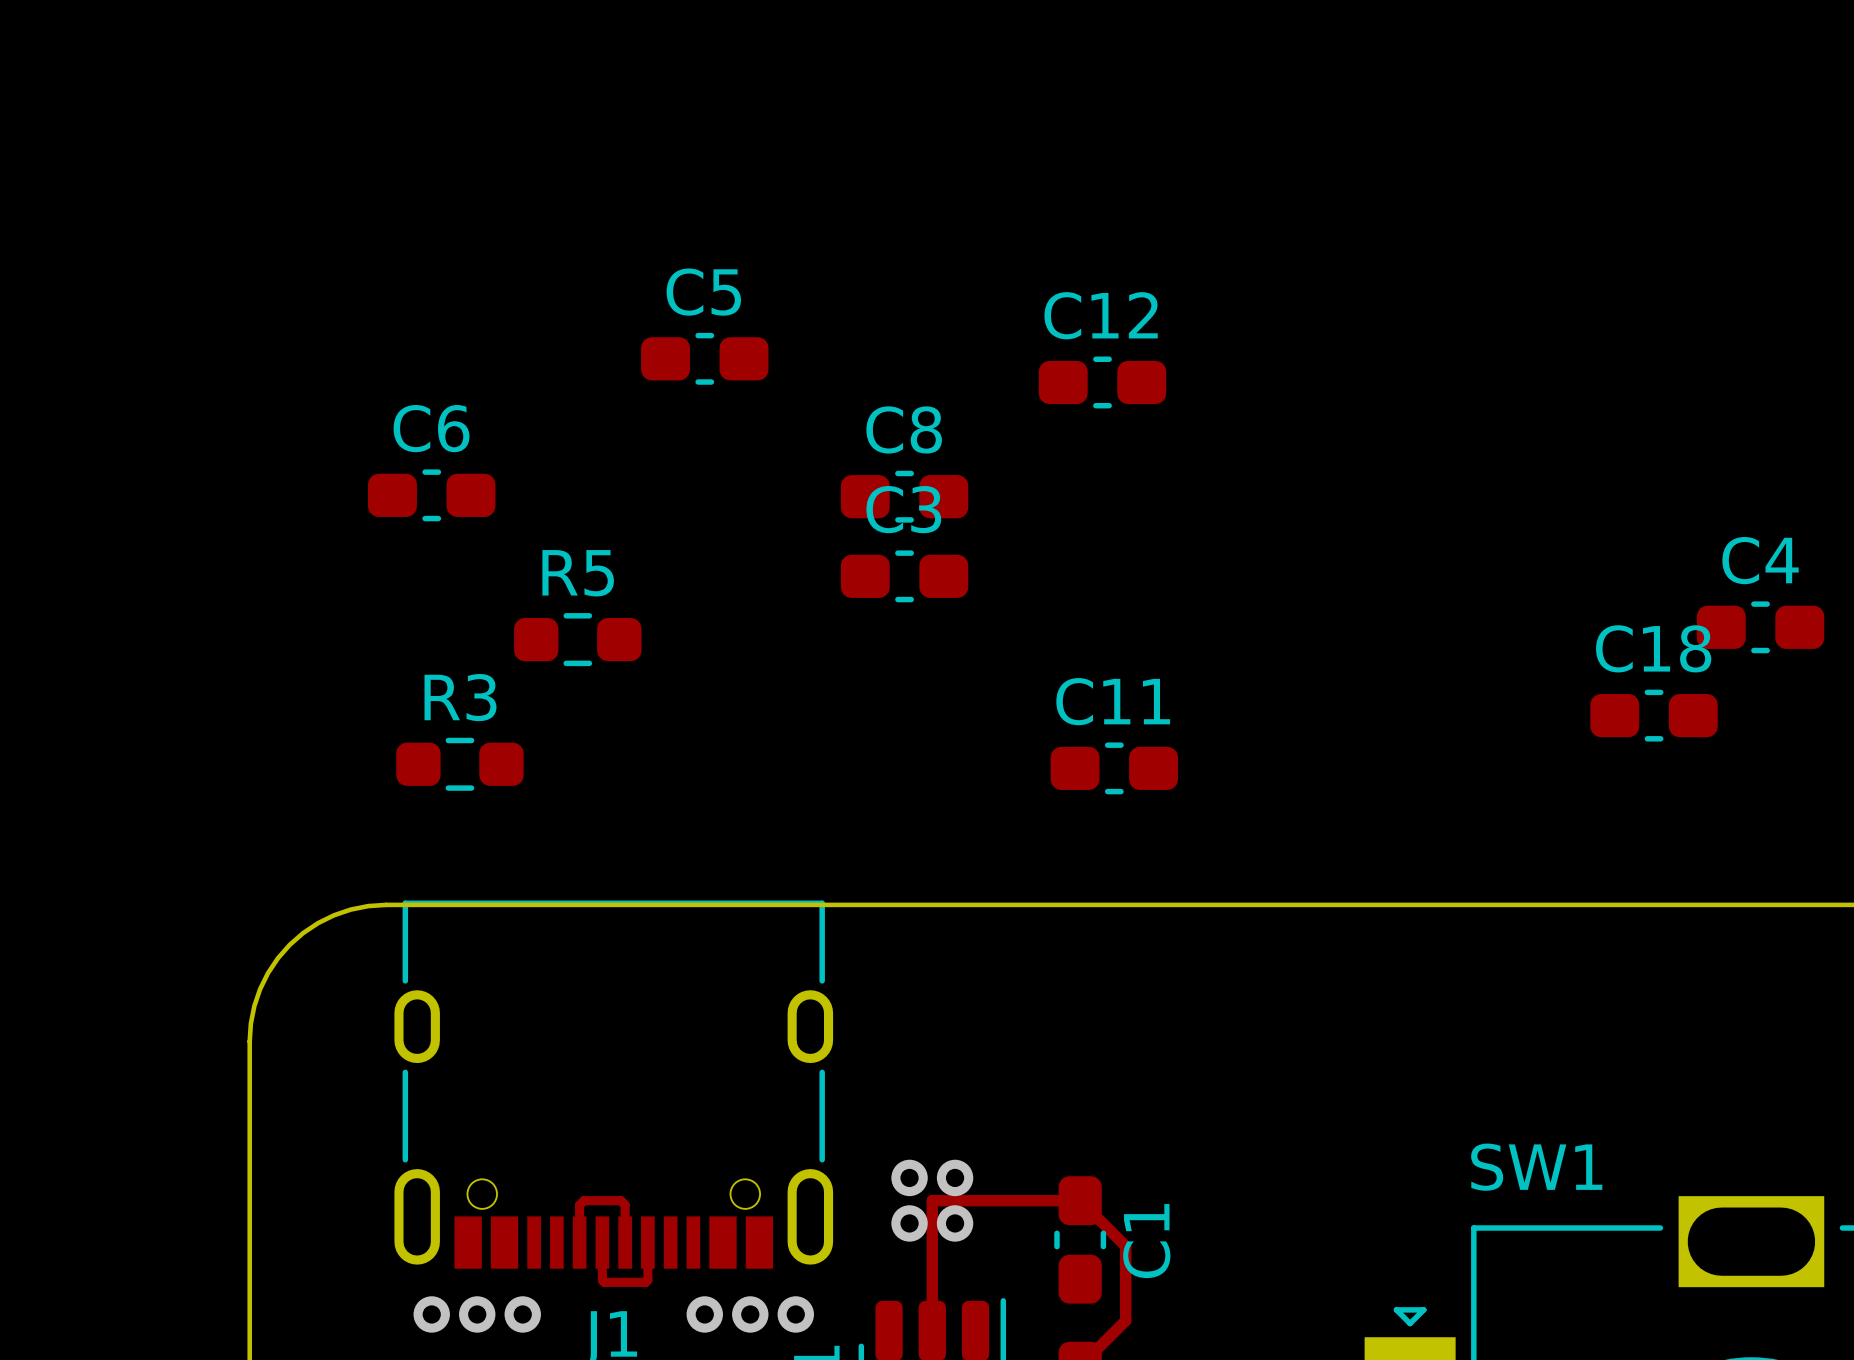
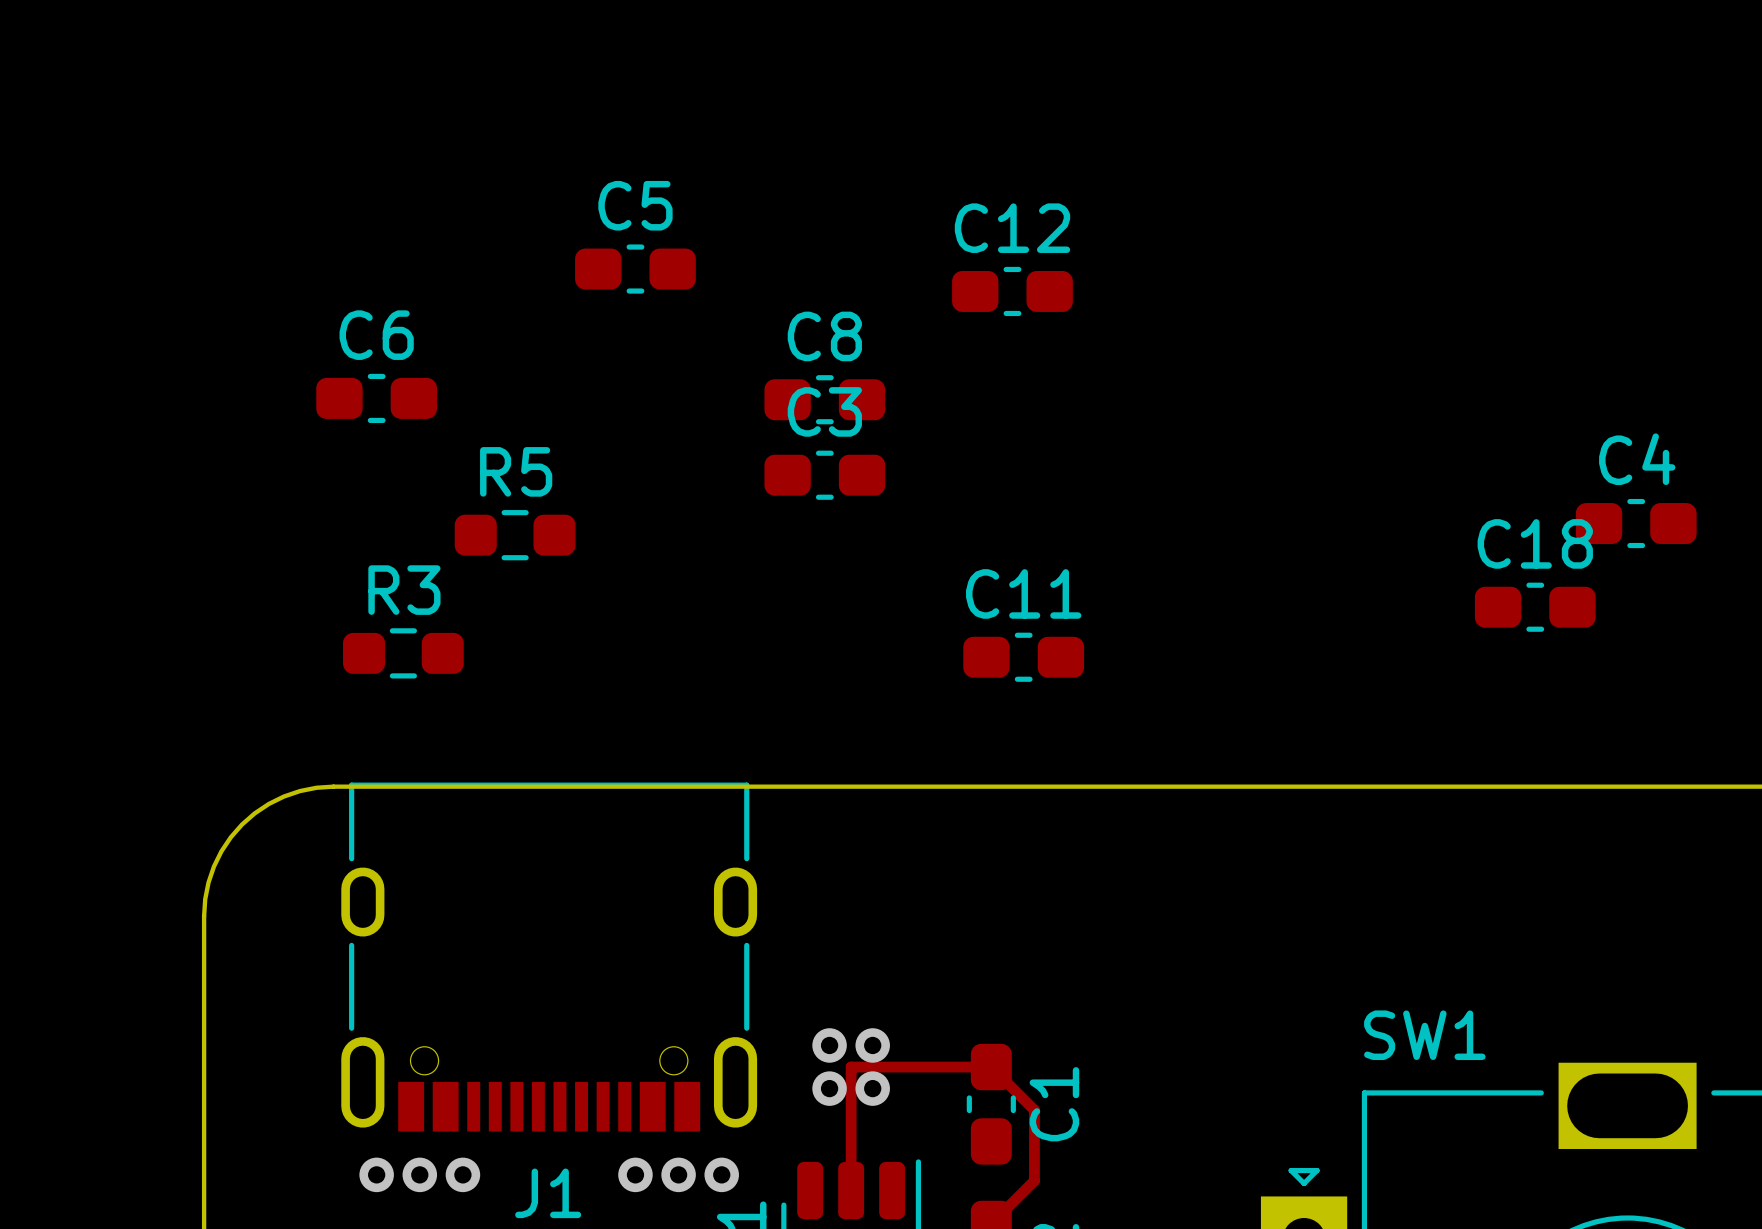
track: (579, 1242) (579, 1205) (583, 1200) (620, 1200) (625, 1205) (625, 1242) -> none
track: (602, 1242) (602, 1280) (604, 1282) (645, 1282) (647, 1280) (647, 1242) -> none

